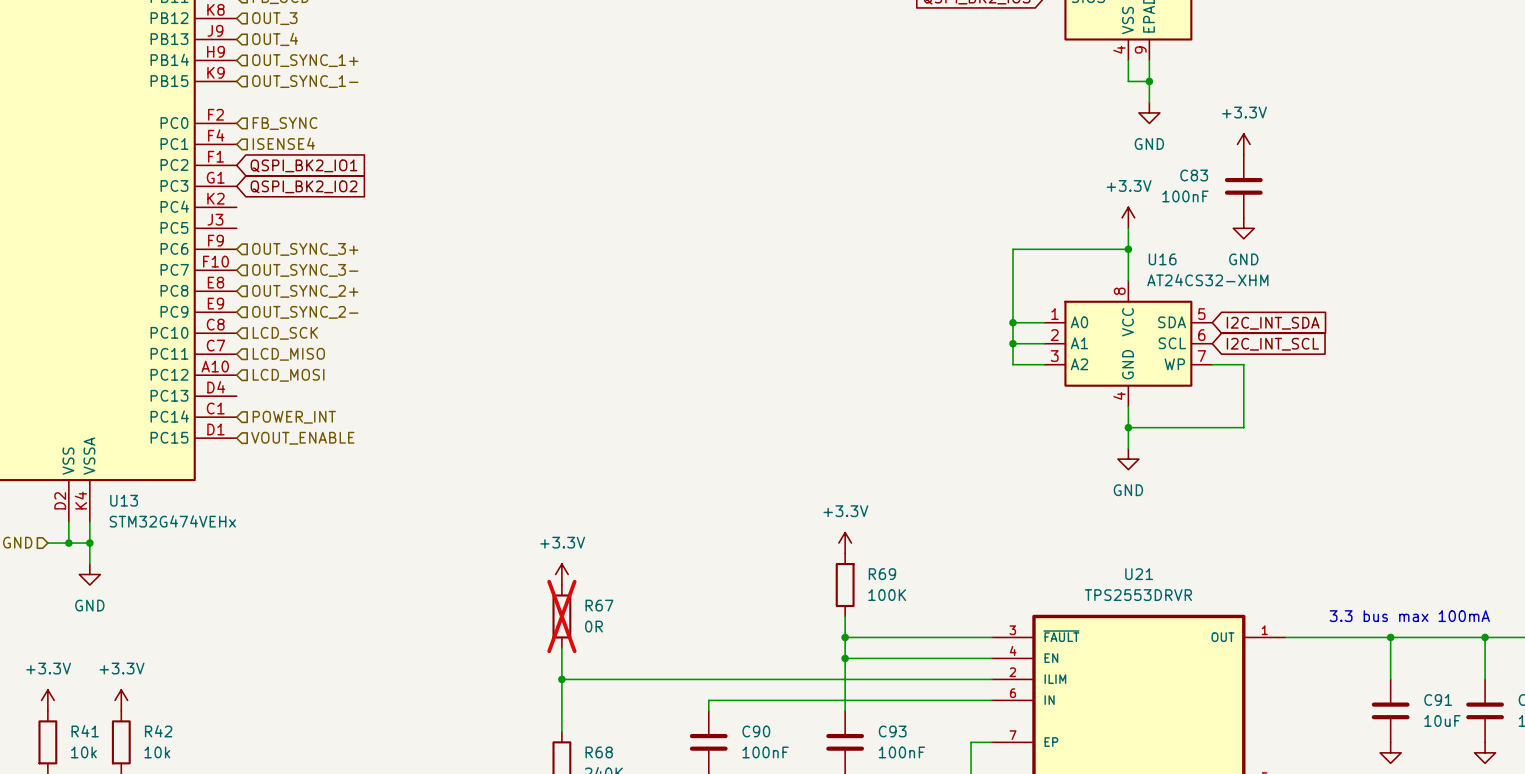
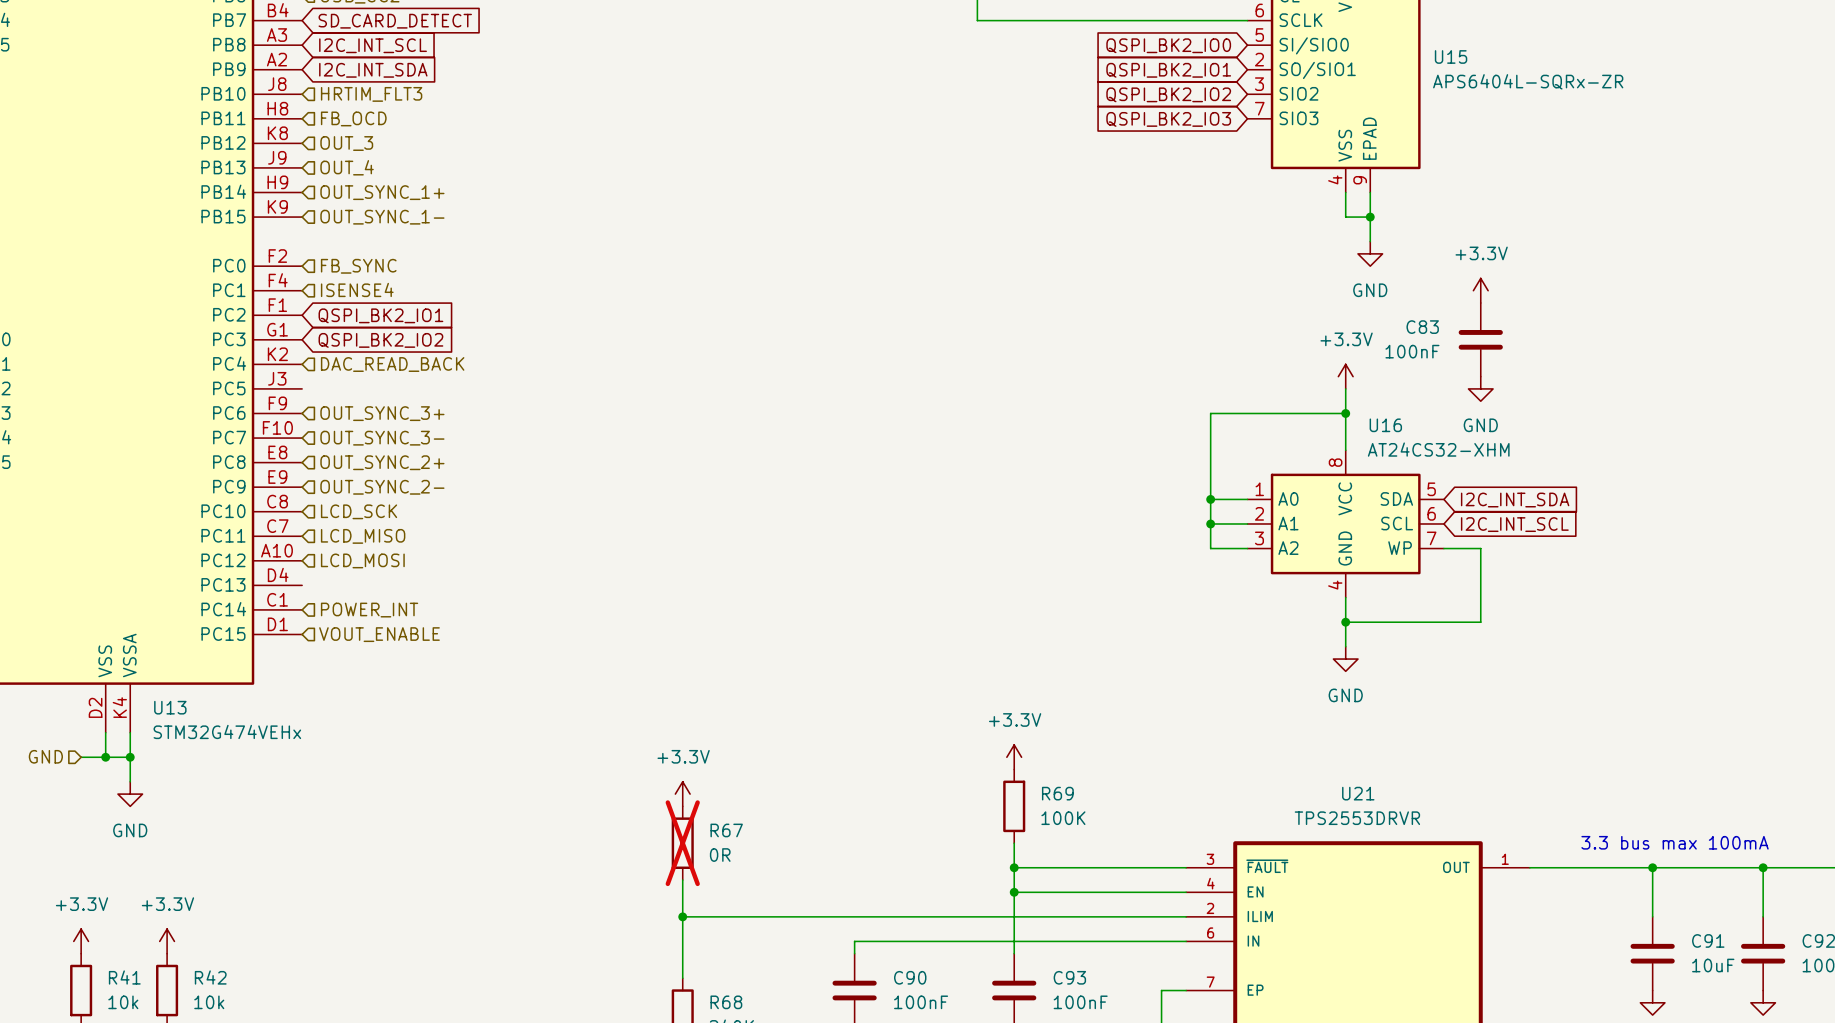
hierarchical label: none -> DAC_READ_BACK (392, 364)

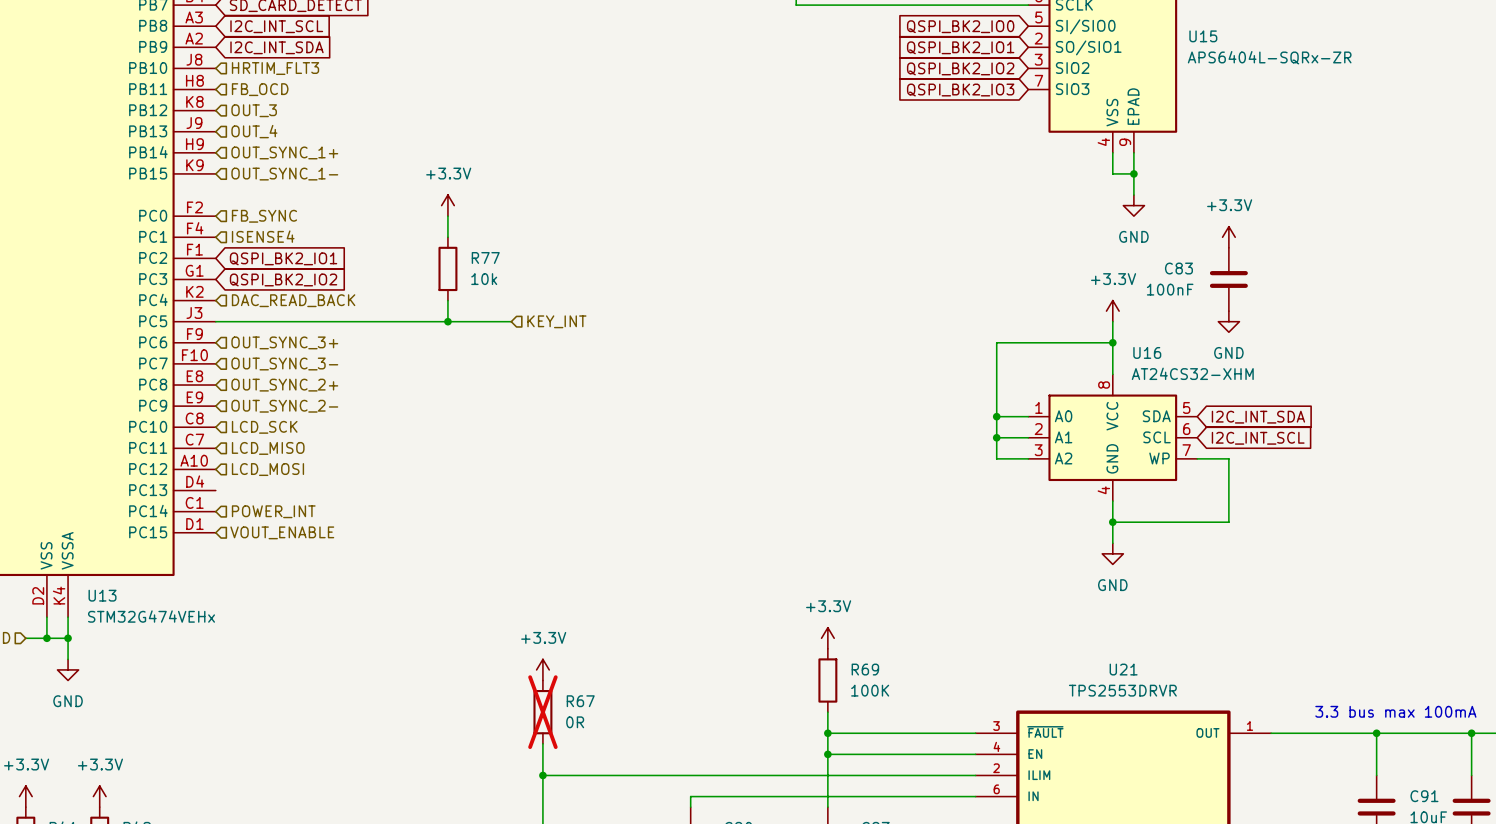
power symbol: none -> +3.3V (447, 205)
wire: none -> (447, 216) (447, 237)
R77: none -> 10k (447, 268)
wire: none -> (447, 300) (447, 321)
wire: none -> (215, 321) (511, 321)
junction: none -> (447, 321)
hierarchical label: none -> KEY_INT (556, 321)

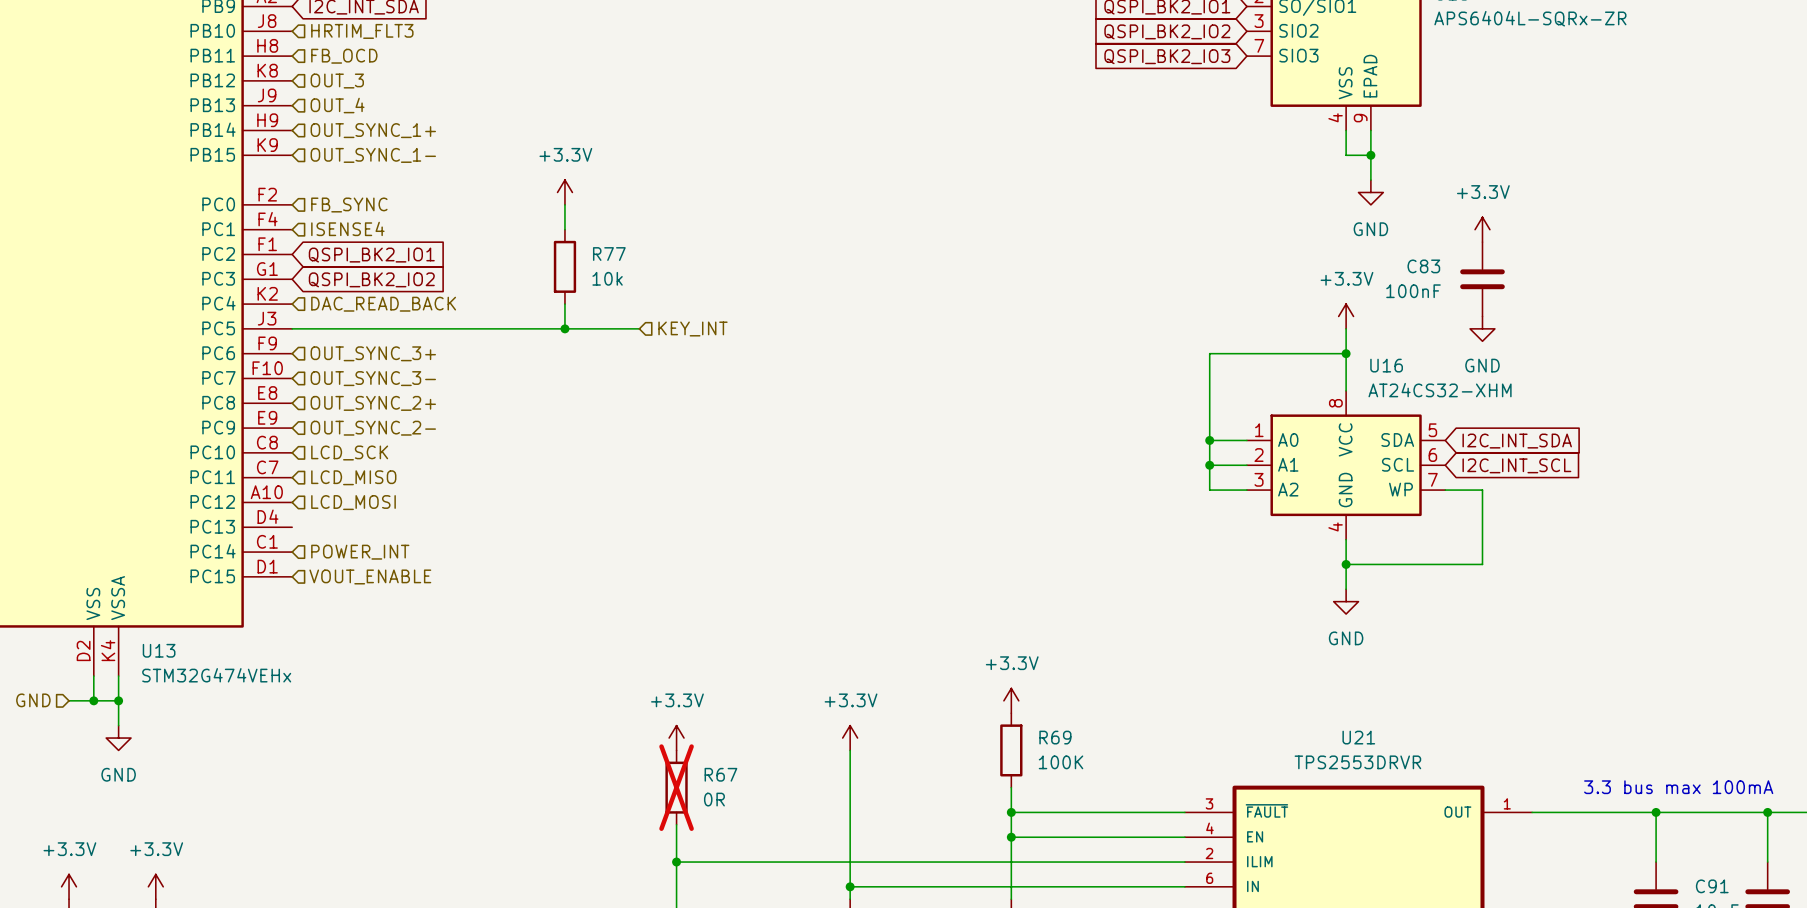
power symbol: none -> +3.3V (850, 738)
wire: none -> (850, 750) (850, 886)
junction: none -> (850, 886)

